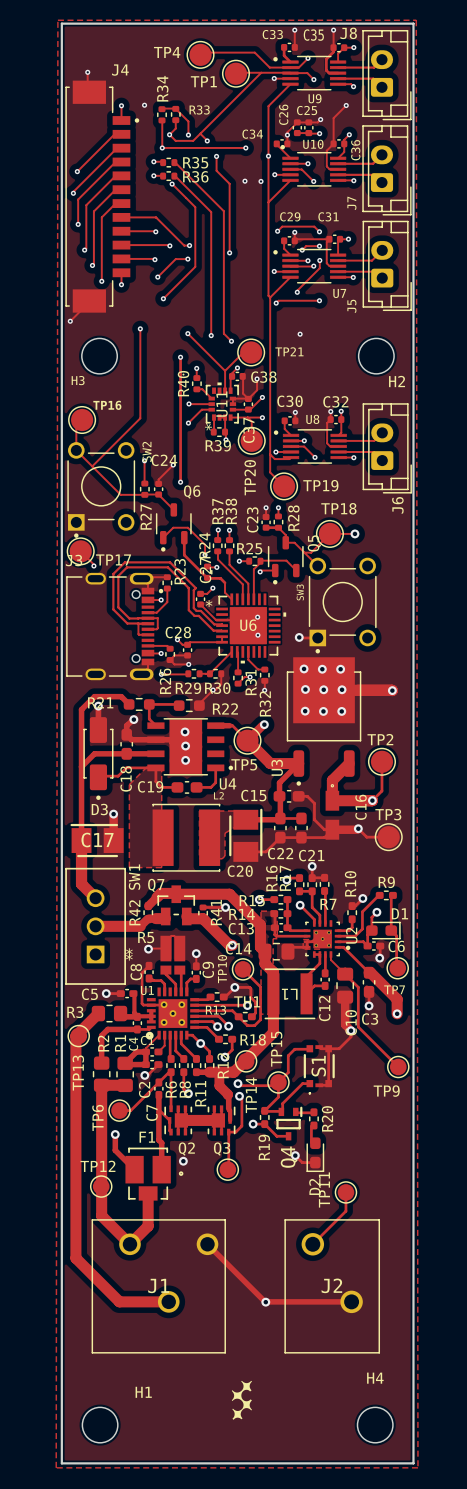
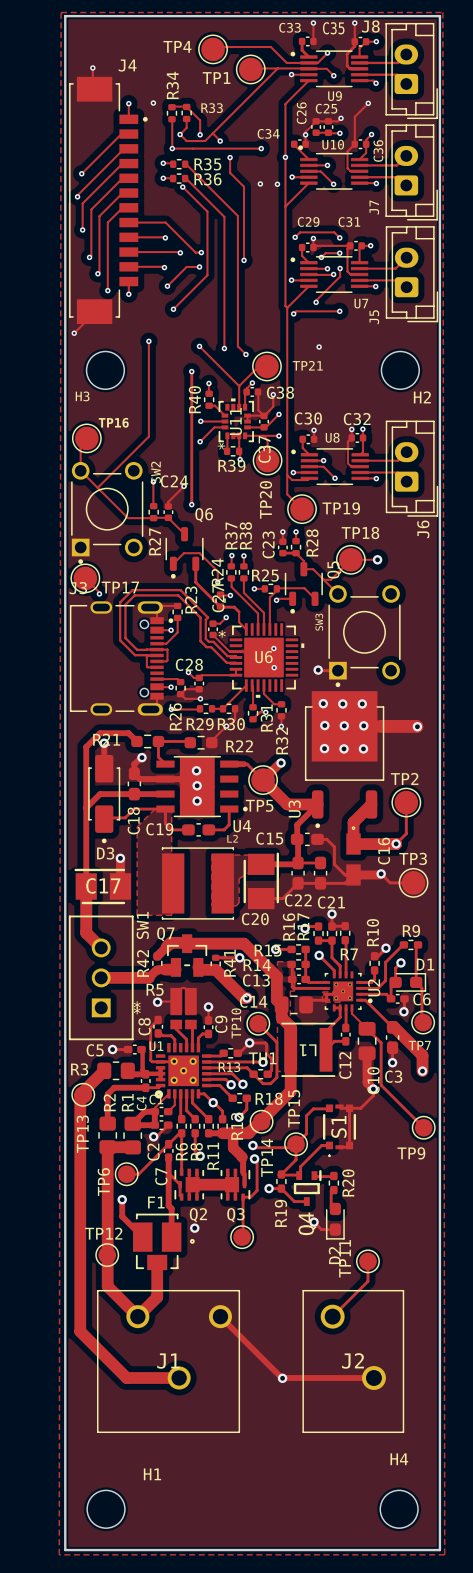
drawing: [231, 1380, 252, 1420] -> none

